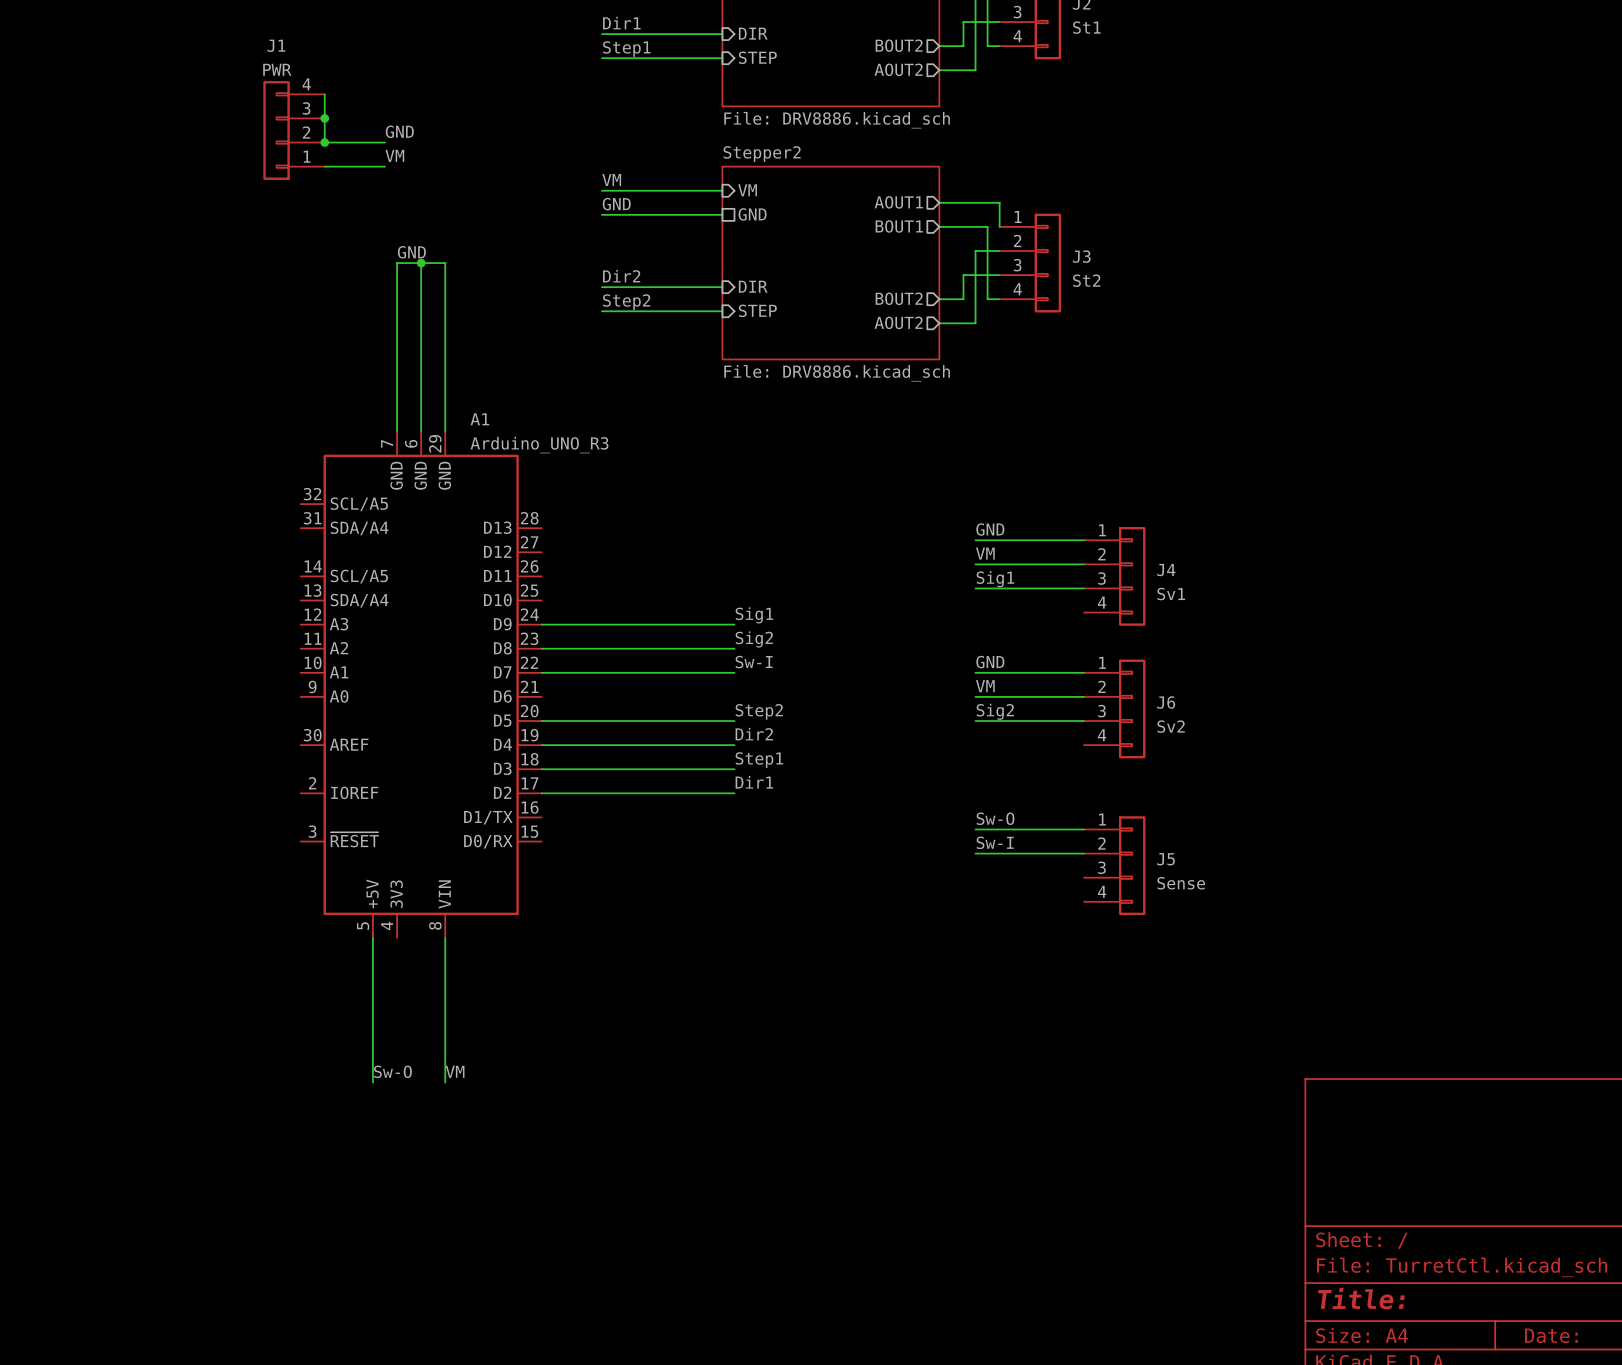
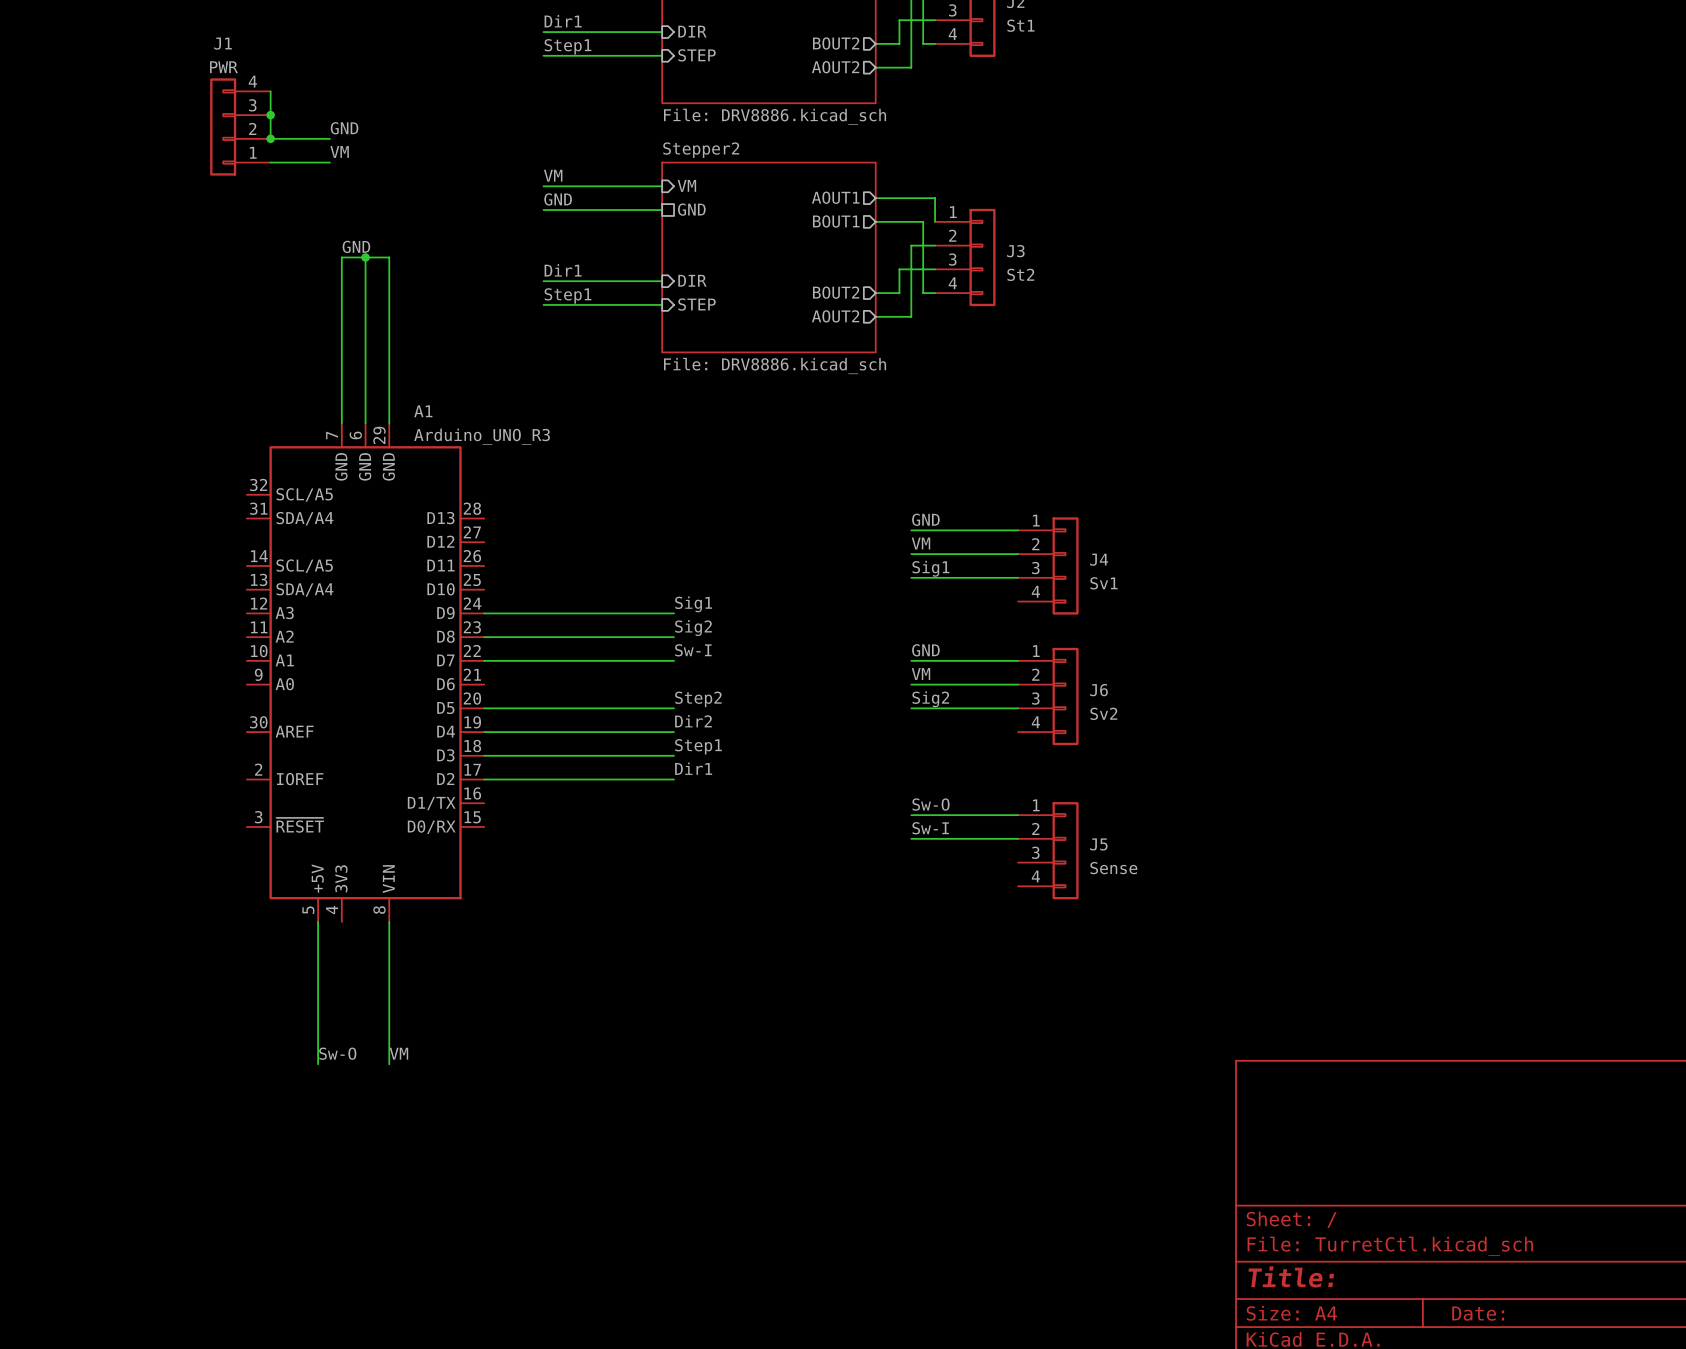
label: Dir2 (621, 276) -> Dir1 (563, 270)
label: Step2 (626, 302) -> Step1 (568, 295)

